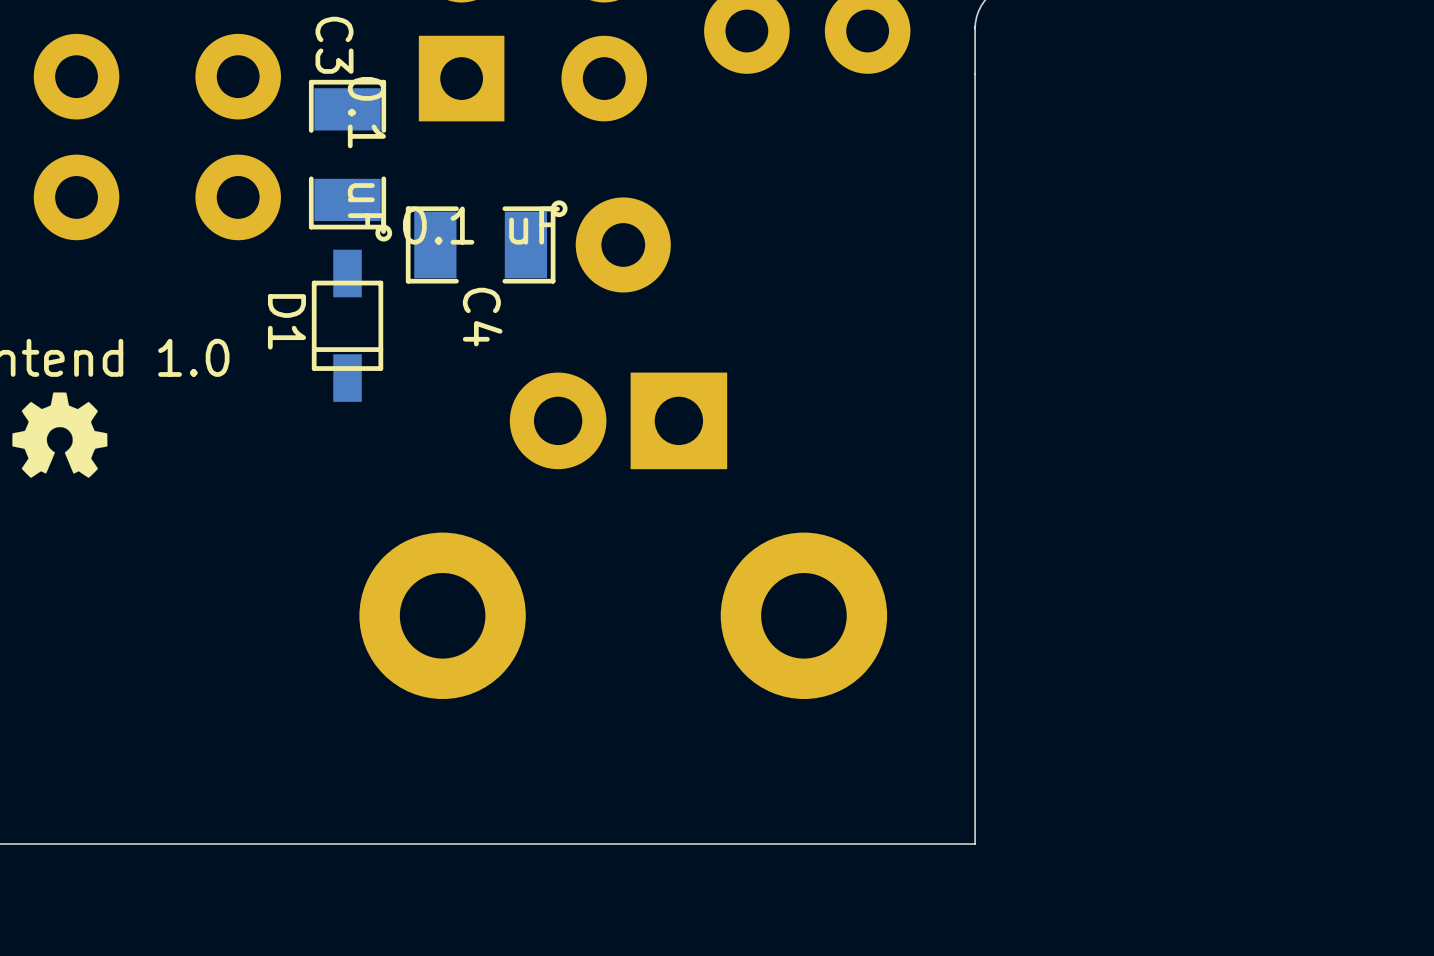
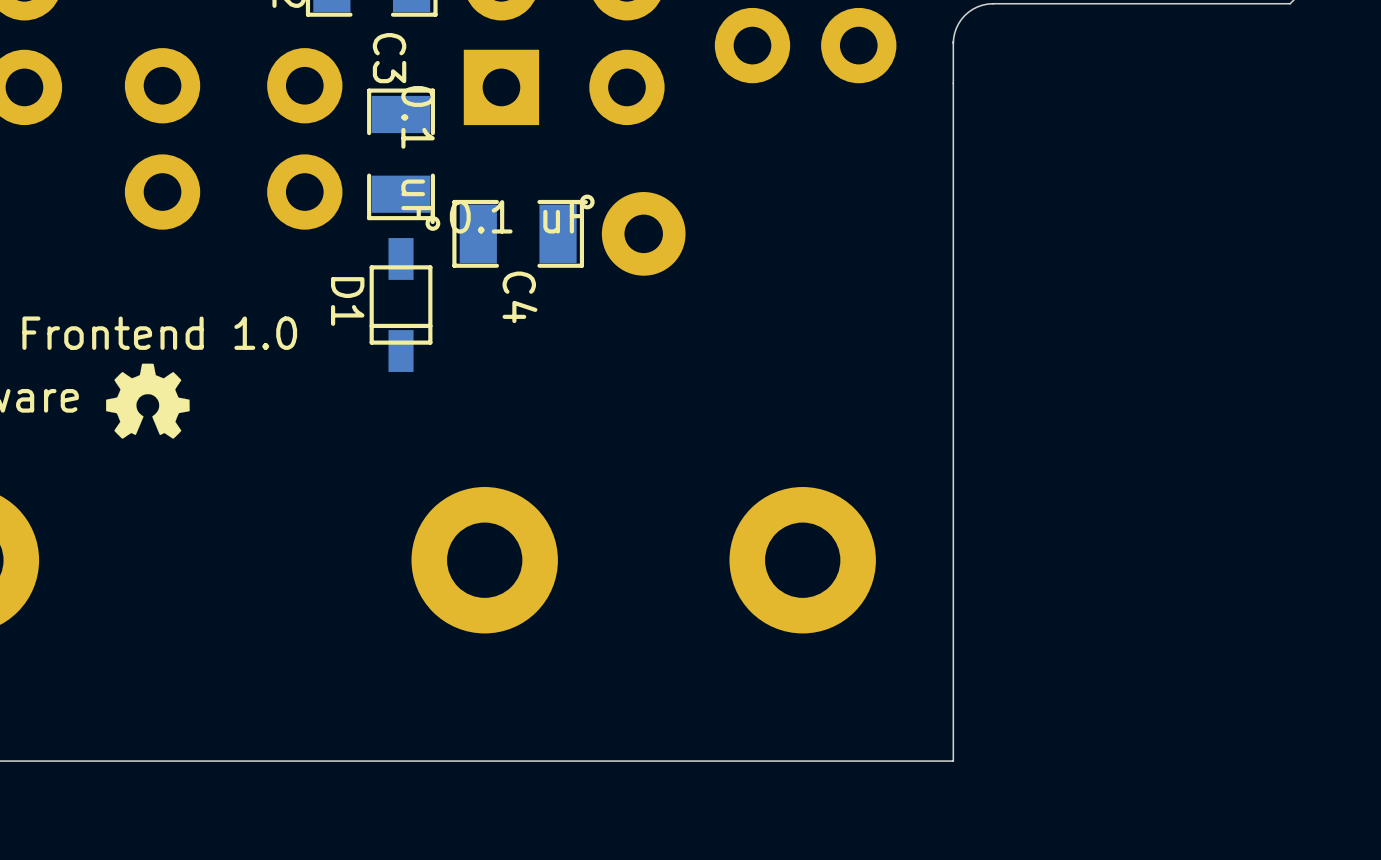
part: (618, 420) -> none

